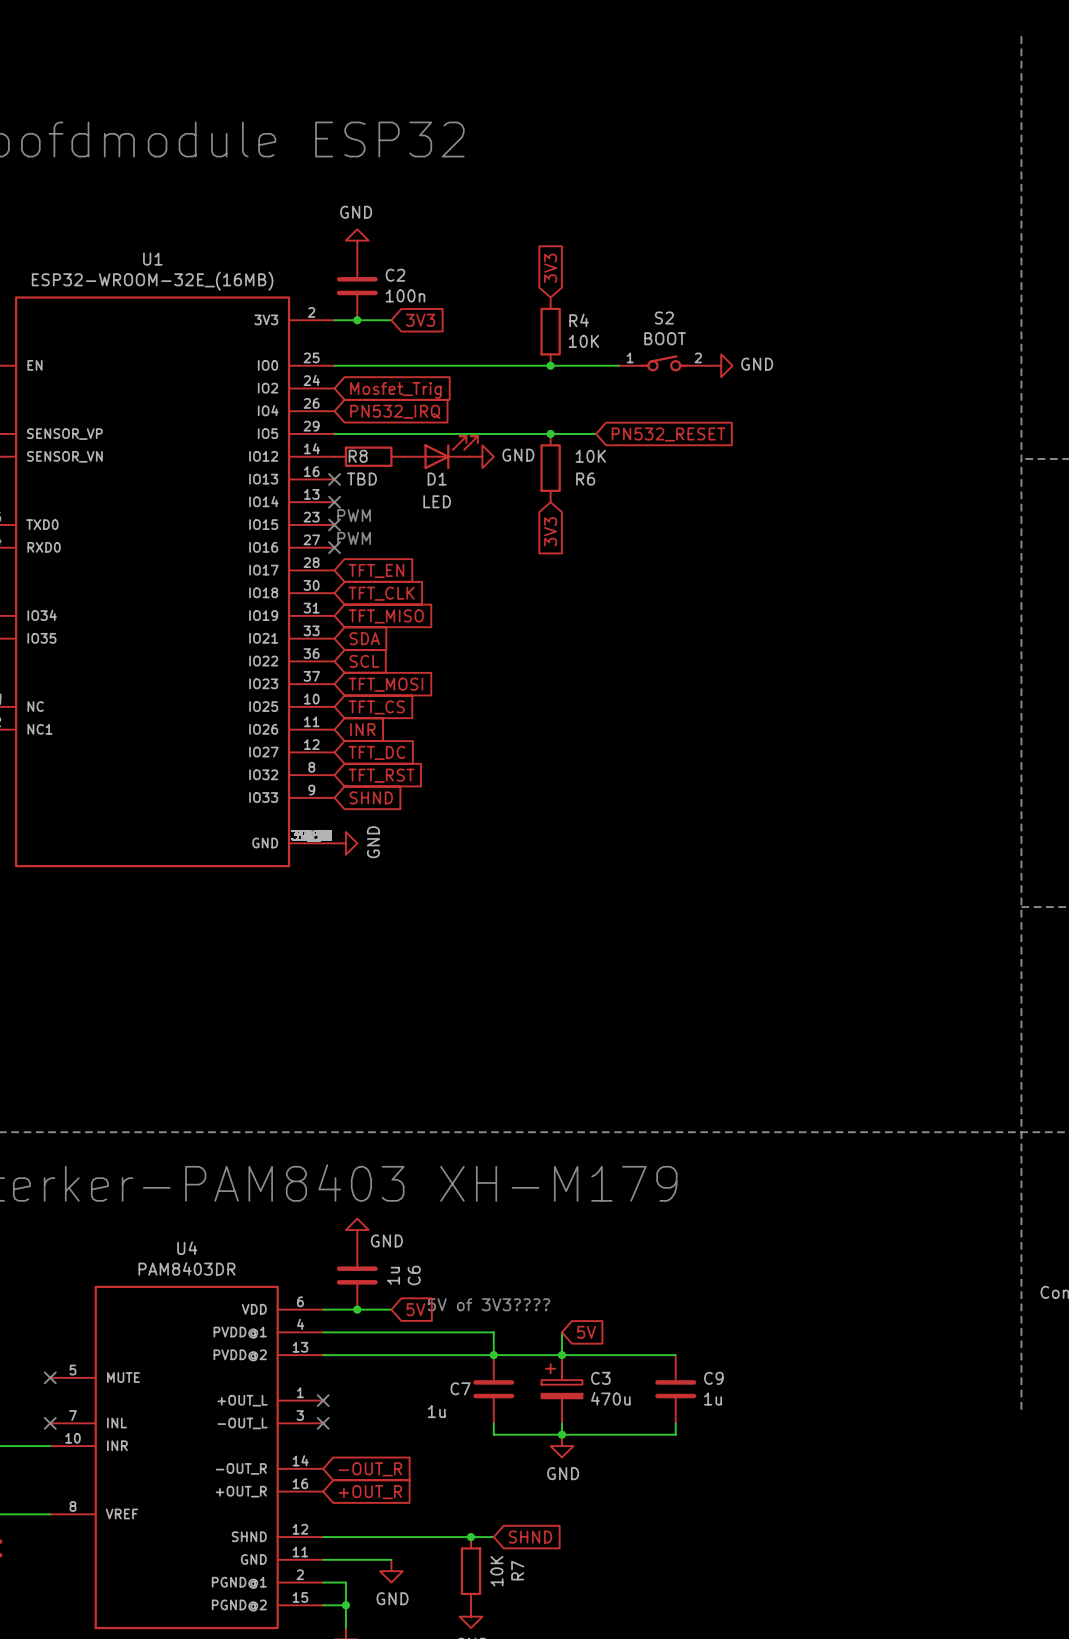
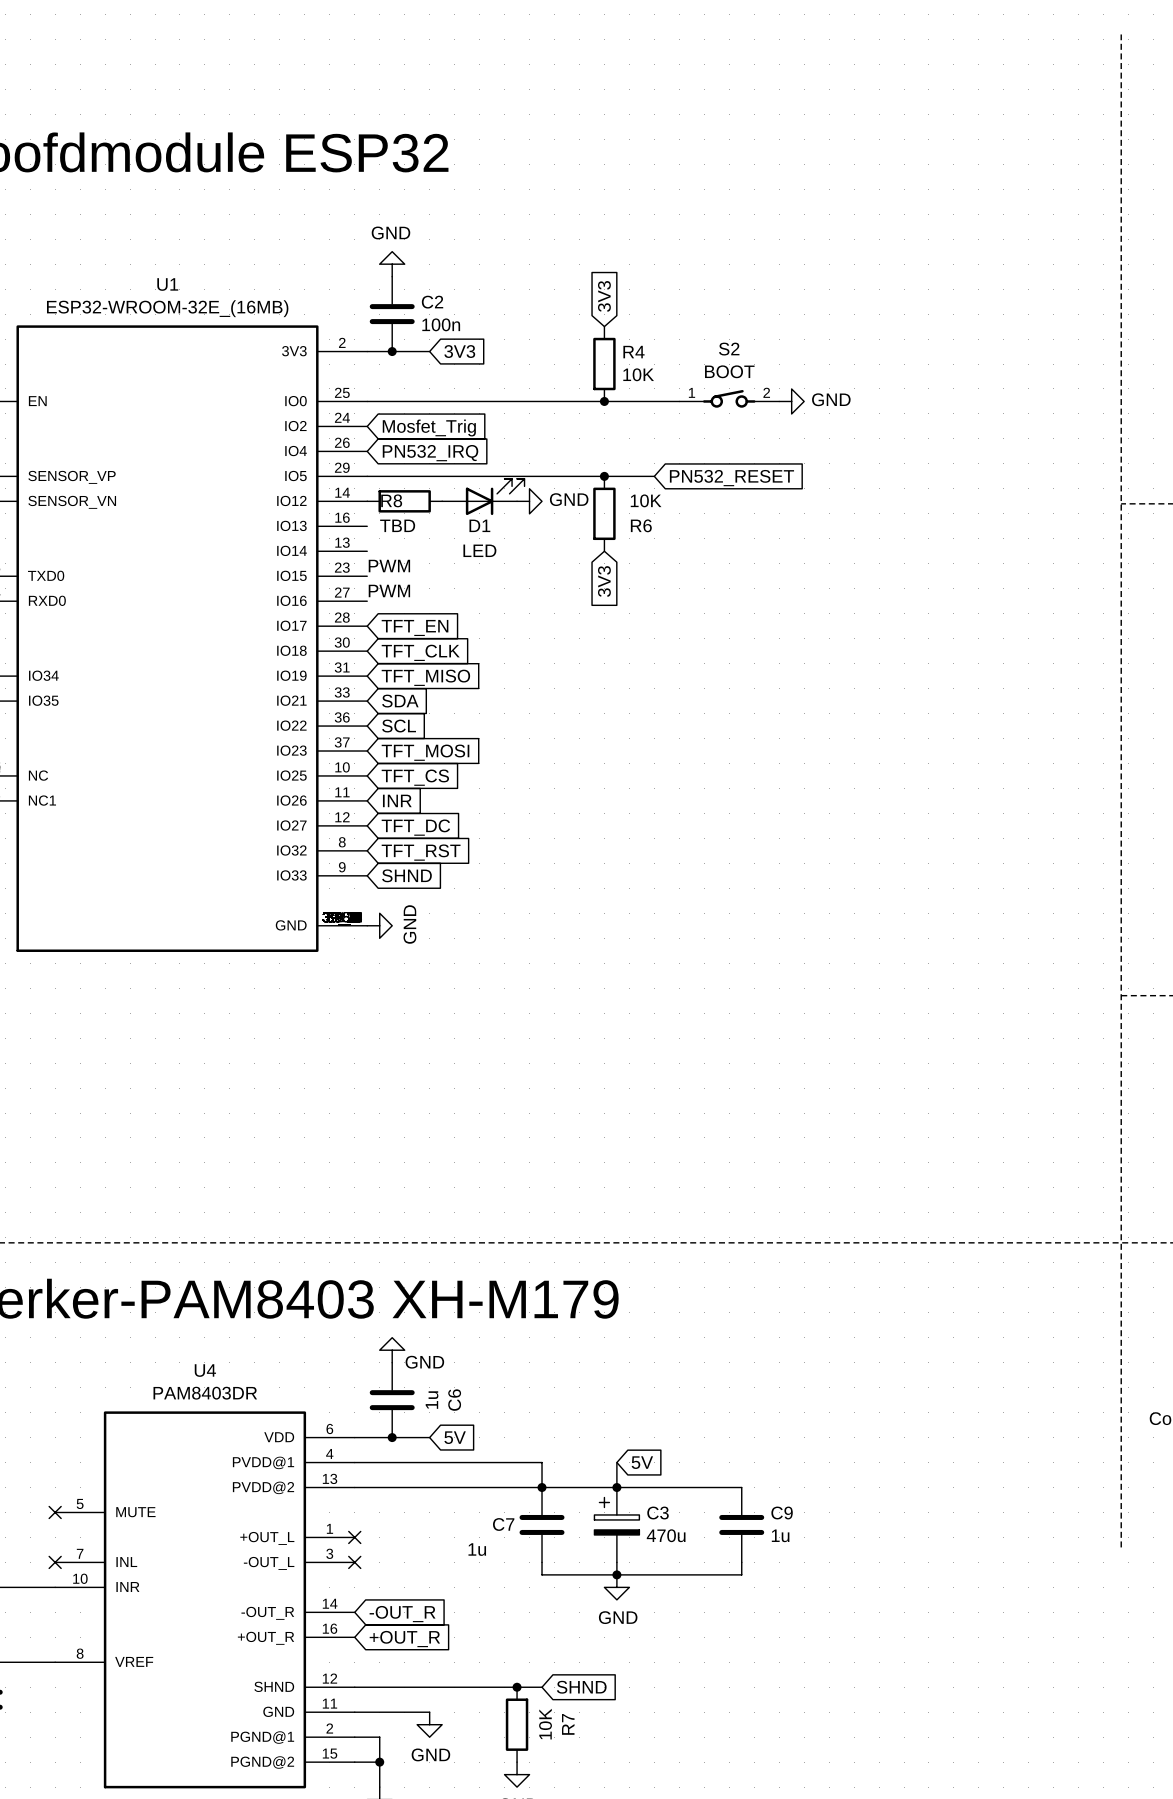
no-connect mark: (334, 479) -> none
no-connect mark: (334, 502) -> none
no-connect mark: (334, 524) -> none
no-connect mark: (334, 547) -> none
text: 5V of 3V3???? (488, 1304) -> none

